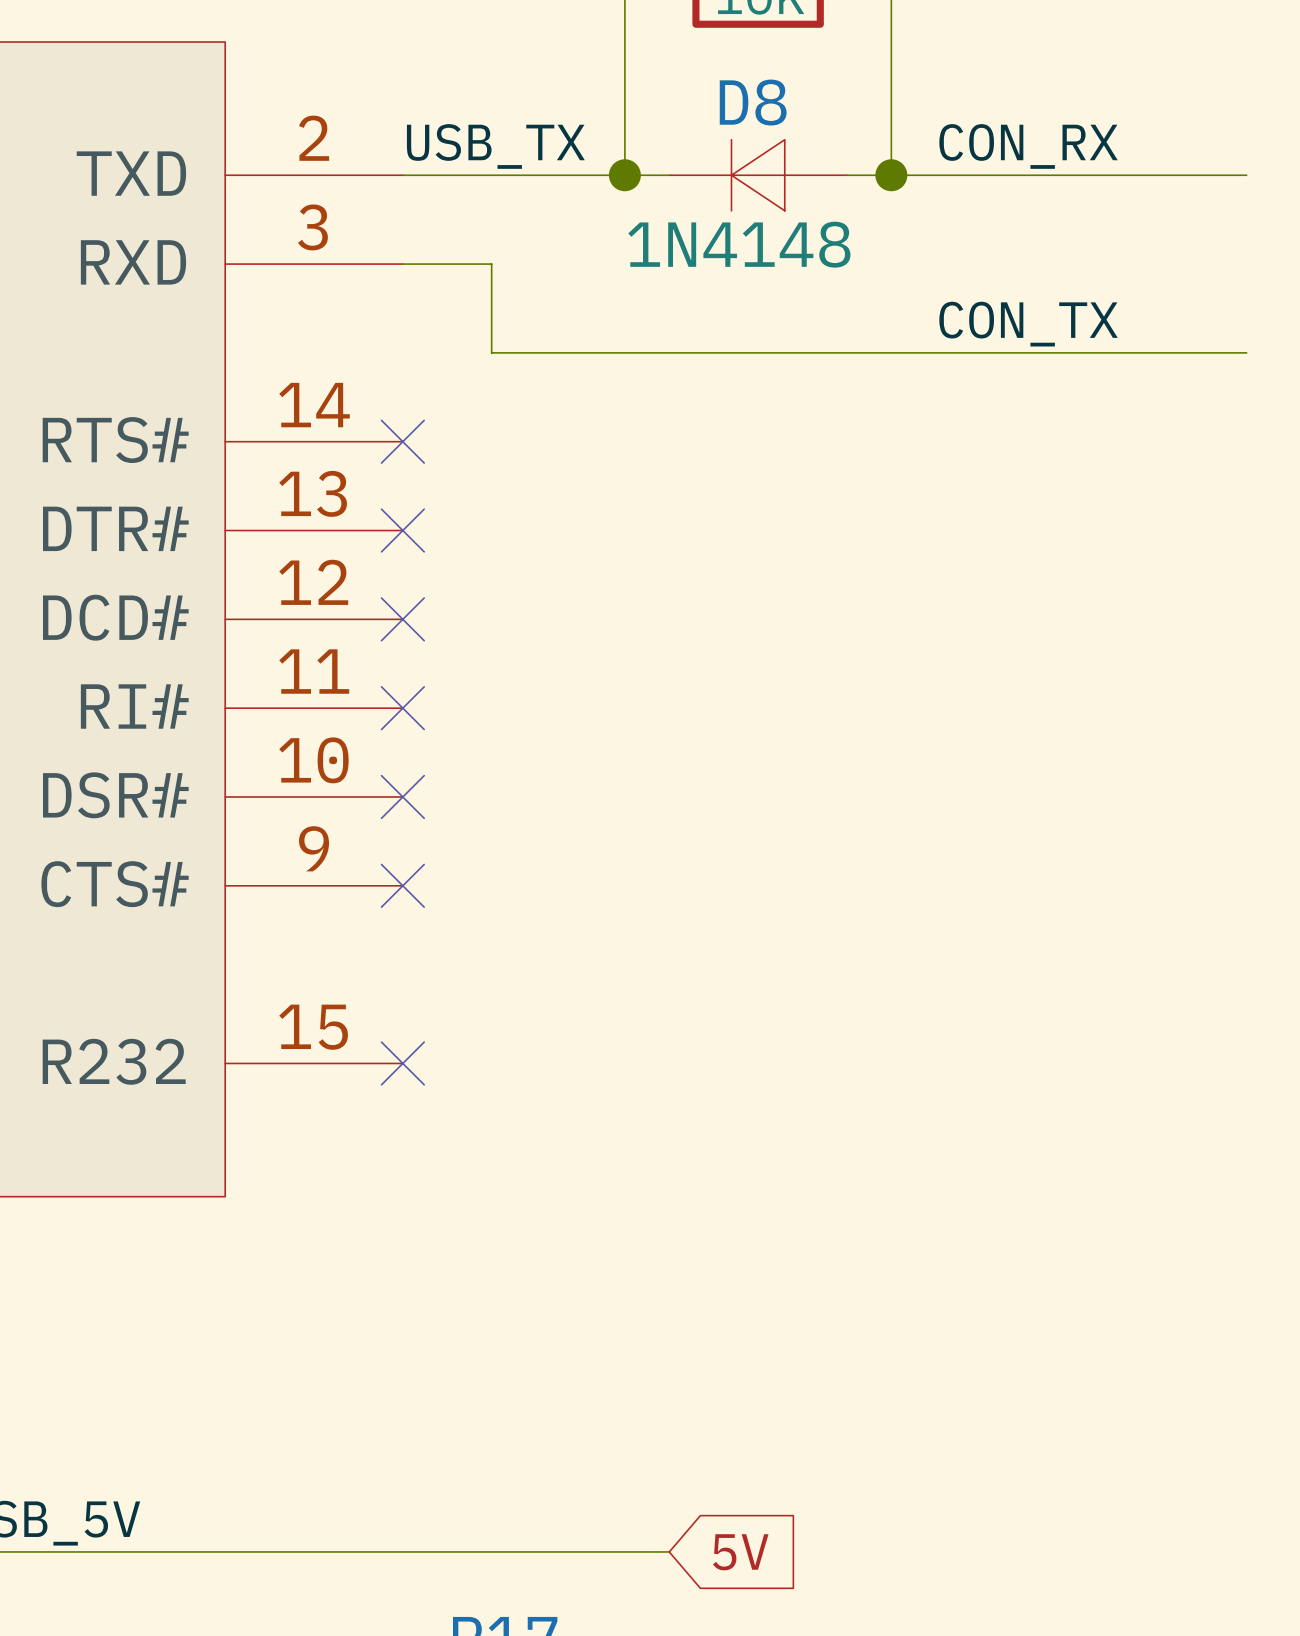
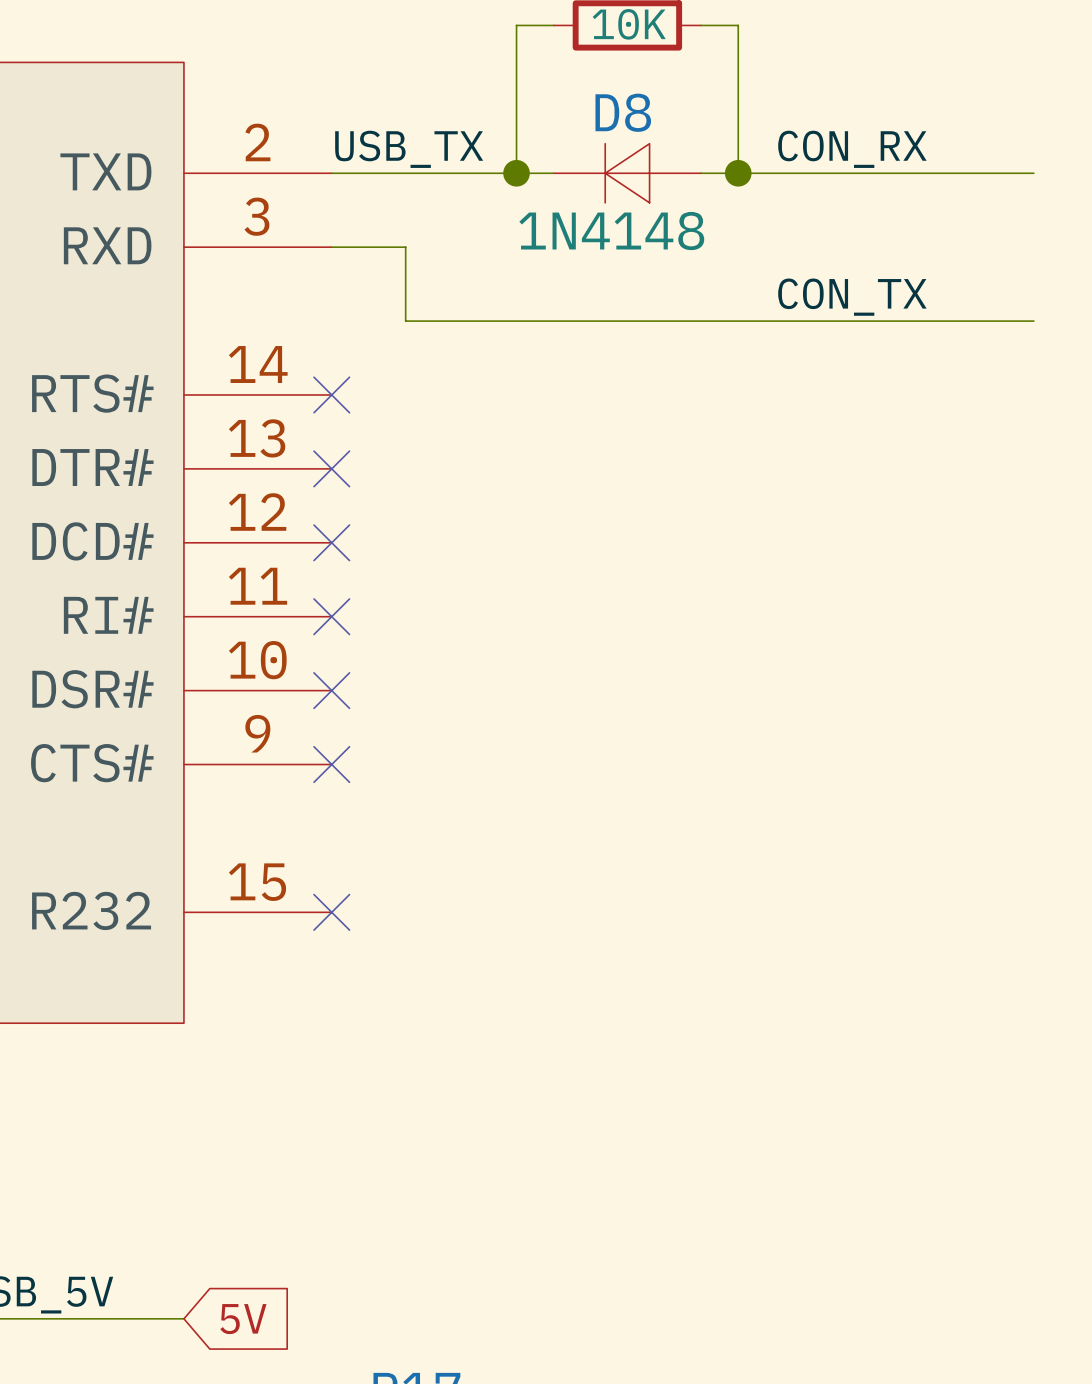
wire: (225, 1551) (669, 1551) -> none
global label position: 5V (740, 1552) -> 5V (243, 1319)

